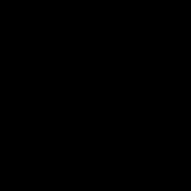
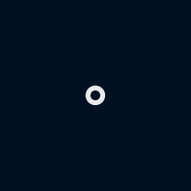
via: none -> (95, 95)

